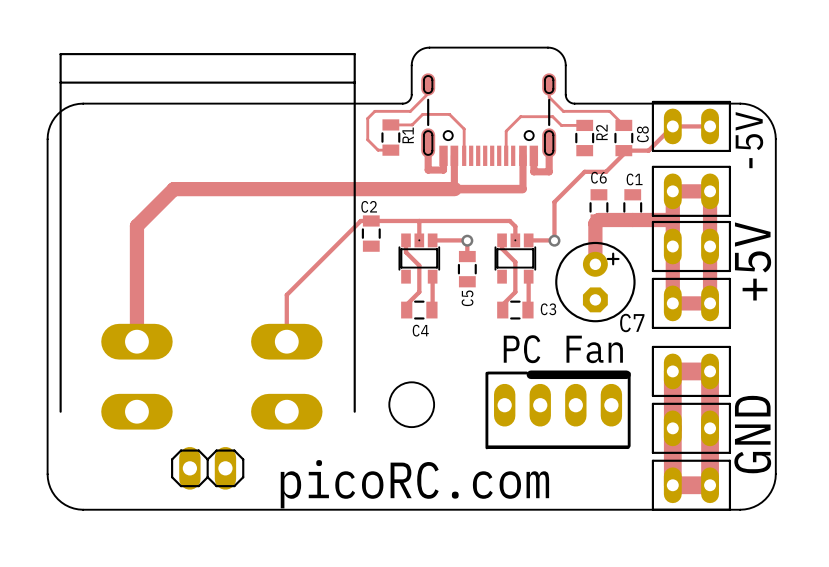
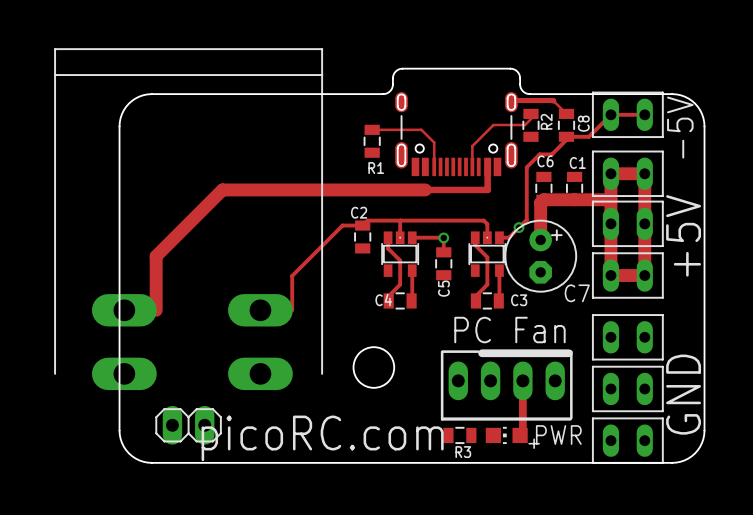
track: (428, 84) (428, 93) (410, 111) (374, 111) (367, 118) (367, 139) (378, 150) (390, 150) -> none
track: (549, 84) (549, 97) (563, 111) (609, 111) -> (511, 102) (513, 100) (553, 101)
board edge: (167, 103) (73, 104) (61, 110) (54, 117) (48, 129) (47, 139) (48, 483) (58, 499) (73, 508) (167, 509) -> (151, 94) (139, 96) (128, 103) (121, 114) (119, 126) (119, 434) (121, 442) (128, 453) (139, 460) (151, 462)
board edge: (402, 103) (408, 101) (411, 97) (413, 58) (420, 49) (429, 47) (554, 48) (562, 54) (565, 60) (566, 99) (572, 103) (583, 103) -> (365, 94) (384, 94) (389, 92) (392, 86) (394, 73) (402, 68) (512, 68) (519, 74) (522, 90) (529, 94)
part position: (488, 119) -> (456, 134)
track: (390, 124) (412, 124) (422, 114) (449, 114) (464, 129) (464, 155) -> none
track: (584, 125) (561, 125) (552, 116) (520, 116) (506, 131) (506, 155) -> none
track: none -> (536, 113) (525, 125) (493, 125) (472, 146) (472, 166)
R1 name rotation: 0° (408, 135) -> 90° clockwise (376, 168)
R1 name position: R1 (408, 135) -> R1 (376, 168)
R1 position: (390, 137) -> (372, 141)
track: none -> (372, 129) (421, 129) (434, 142) (434, 166)
track: (428, 143) (428, 170) (443, 170) (443, 155) -> none
track: (549, 143) (549, 171) (533, 171) (533, 155) -> none
track: (454, 155) (454, 189) -> none
track: (522, 155) (522, 189) (454, 189) -> none
track: (607, 170) (606, 171) (584, 171) (554, 202) (554, 240) (528, 240) -> (551, 154) (539, 154) (526, 167) (526, 219) (508, 237) (499, 237)
track: none -> (487, 166) (487, 189) (222, 189) (156, 256) (156, 310)
track: (454, 189) (173, 189) (136, 226) (136, 341) -> none
track: (419, 220) (419, 240) -> none
C2 position: (371, 233) -> (362, 236)
track: (406, 240) (406, 252) (419, 265) (419, 292) (406, 304) (406, 310) -> (388, 237) (388, 248) (400, 260) (400, 284) (388, 296) (388, 300)
track: (432, 240) (467, 240) (467, 256) -> (412, 237) (443, 237) (443, 252)
via position: (467, 240) -> (443, 237)
track: (502, 240) (502, 248) (515, 262) (515, 292) (502, 304) (502, 310) -> (475, 237) (475, 245) (487, 257) (487, 284) (475, 296) (475, 300)
track: (515, 240) (515, 226) (509, 220) (360, 220) (286, 294) (286, 341) -> none
via position: (554, 240) -> (519, 227)
track: none -> (400, 220) (400, 237)
part position: (419, 258) -> (400, 254)
part position: (515, 258) -> (487, 254)
track: none -> (487, 237) (487, 224) (483, 220) (367, 220) (362, 225) (342, 225) (292, 275) (292, 310)
C5 position: (467, 269) -> (443, 263)
track: (432, 276) (431, 310) -> (412, 270) (411, 300)
track: (528, 276) (527, 310) -> (499, 270) (498, 300)
C4 position: (419, 310) -> (400, 300)
C3 position: (515, 310) -> (487, 300)
text position: PC Fan (563, 349) -> PC Fan (509, 330)
track: (672, 371) (672, 485) (710, 485) (710, 371) (672, 371) -> none
part position: (558, 409) -> (506, 385)
track: none -> (522, 380) (522, 432) (520, 435)
R3: none -> (459, 435)
part: none -> (506, 435)
text: none -> PWR (558, 435)
text position: picoRC.com (414, 484) -> picoRC.com (322, 438)

